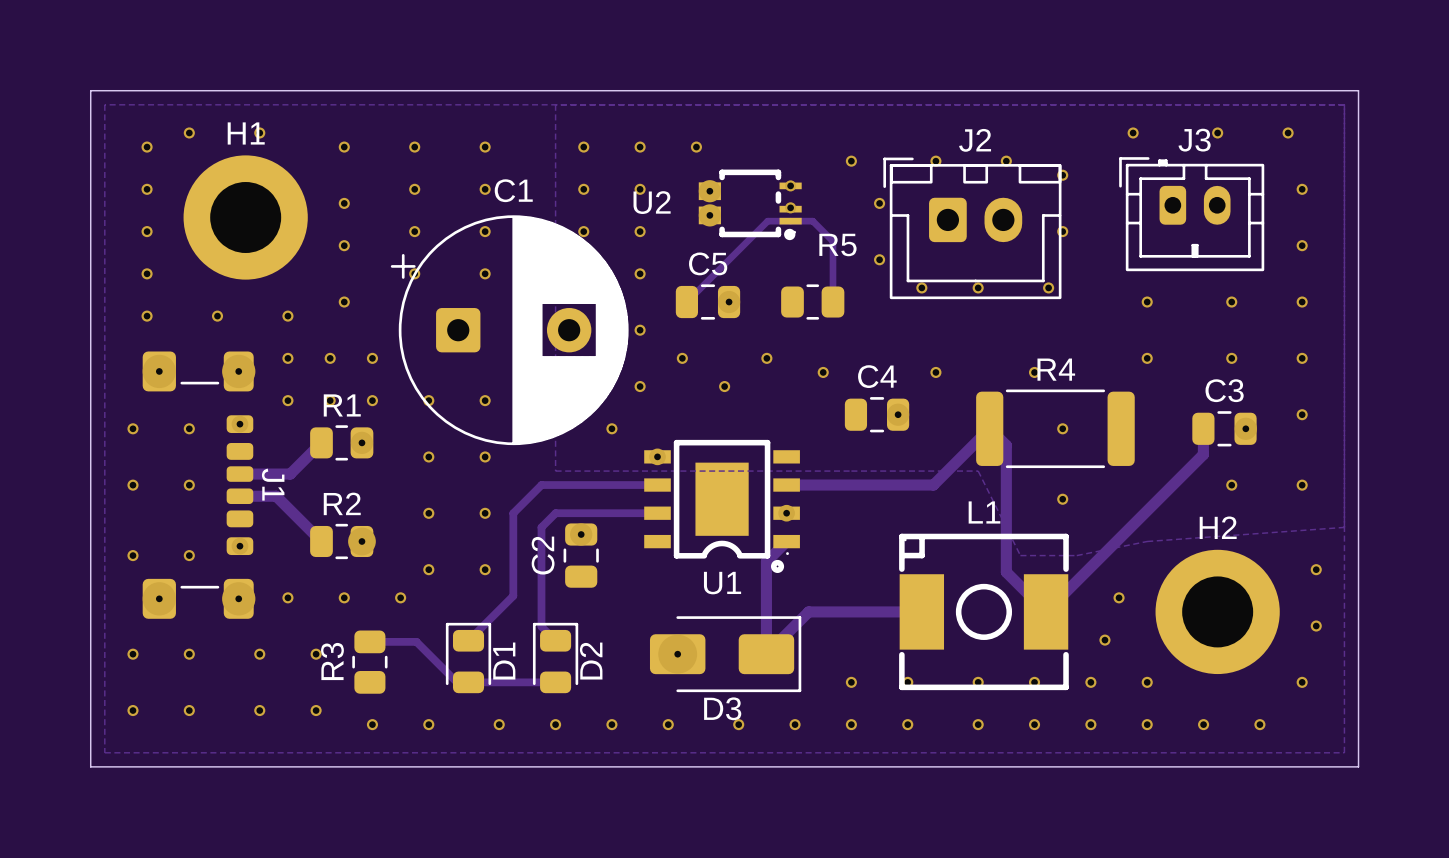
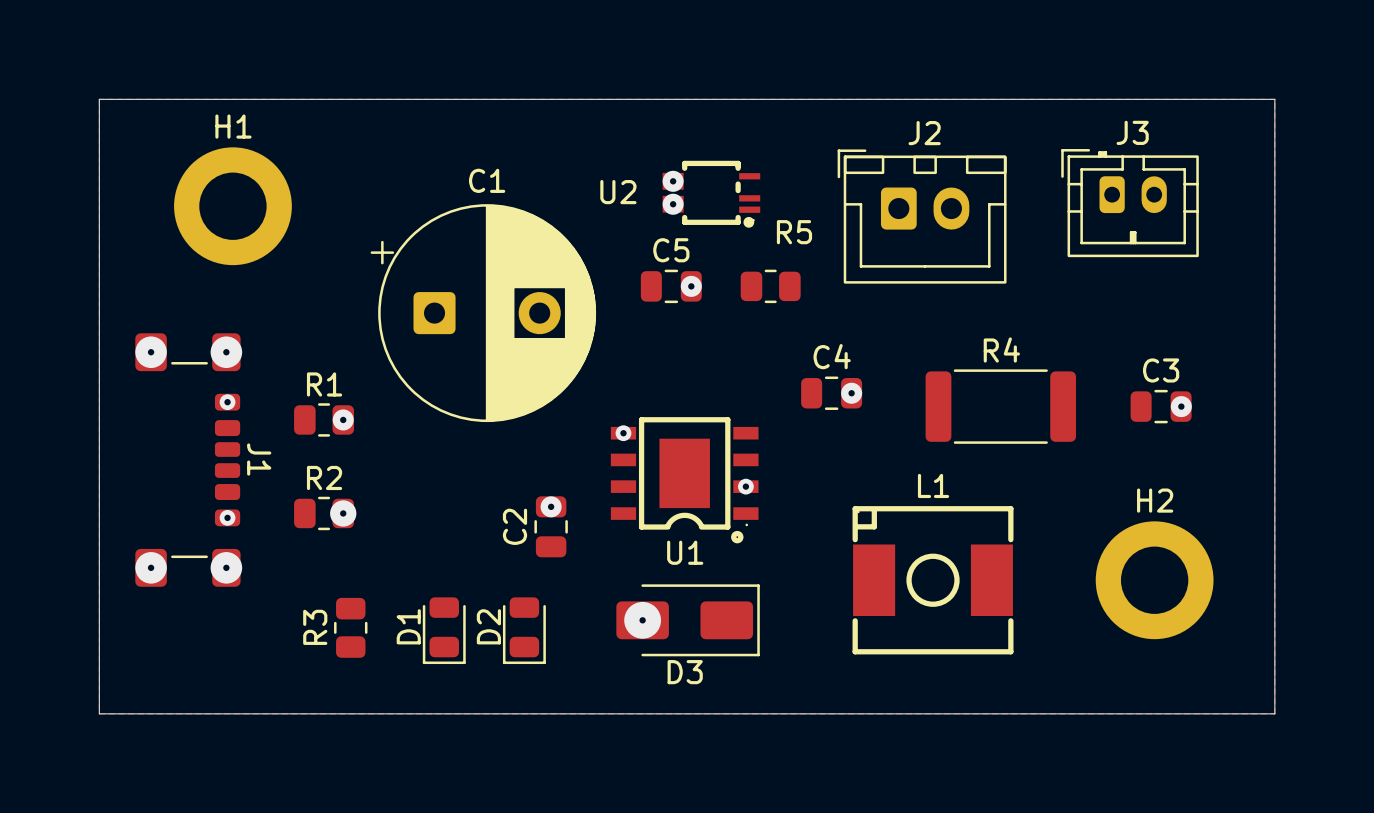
board edge: (90, 90) (1358, 90) (1358, 766) (90, 766) (90, 90) -> (99, 99) (99, 713) (1274, 713) (1274, 99) (99, 99)
zone outline: (555, 104) (555, 471) (978, 471) (1020, 555) (1076, 555) (1147, 541) (1344, 527) -> none
via: (189, 132) -> none
via: (259, 132) -> none
via: (1133, 132) -> none
via: (1217, 132) -> none
via: (1288, 132) -> none
via: (147, 147) -> none
via: (344, 147) -> none
via: (414, 147) -> none
via: (485, 147) -> none
via: (583, 147) -> none
via: (640, 147) -> none
via: (696, 147) -> none
via: (851, 161) -> none
via: (935, 161) -> none
via: (1006, 161) -> none
via: (1062, 175) -> none
via: (790, 185) -> none
via: (147, 189) -> none
via: (414, 189) -> none
via: (485, 189) -> none
via: (583, 189) -> none
via: (640, 189) -> none
via: (1302, 189) -> none
via: (344, 203) -> none
via: (879, 203) -> none
via: (790, 207) -> none
via: (147, 231) -> none
via: (414, 231) -> none
via: (485, 231) -> none
via: (583, 231) -> none
via: (640, 231) -> none
via: (1062, 231) -> none
via: (344, 245) -> none
via: (1302, 245) -> none
via: (879, 259) -> none
via: (147, 273) -> none
via: (414, 273) -> none
via: (485, 273) -> none
via: (640, 273) -> none
via: (921, 287) -> none
via: (978, 287) -> none
via: (1048, 287) -> none
via: (344, 302) -> none
track: (686, 302) (767, 221) (812, 221) (832, 241) (832, 302) -> none
via: (1147, 302) -> none
via: (1231, 302) -> none
via: (1302, 302) -> none
via: (147, 316) -> none
via: (217, 316) -> none
via: (287, 316) -> none
via: (640, 330) -> none
via: (287, 358) -> none
via: (330, 358) -> none
via: (372, 358) -> none
via: (682, 358) -> none
via: (766, 358) -> none
via: (1147, 358) -> none
via: (1231, 358) -> none
via: (1302, 358) -> none
via: (823, 372) -> none
via: (935, 372) -> none
via: (1034, 372) -> none
via: (640, 386) -> none
via: (724, 386) -> none
via: (287, 400) -> none
via: (330, 400) -> none
via: (372, 400) -> none
via: (428, 400) -> none
via: (485, 400) -> none
via: (1302, 414) -> none
via: (132, 428) -> none
via: (189, 428) -> none
via: (611, 428) -> none
via: (1062, 428) -> none
track: (1203, 428) (1203, 454) (1046, 611) (1006, 572) (1006, 445) (989, 428) (933, 485) (786, 485) -> none
track: (321, 442) (290, 474) (239, 474) -> none
via: (428, 456) -> none
via: (485, 456) -> none
via: (132, 485) -> none
via: (189, 485) -> none
track: (657, 485) (541, 485) (513, 513) (513, 595) (468, 640) -> none
via: (1231, 485) -> none
via: (1302, 485) -> none
track: (239, 496) (276, 496) (321, 541) -> none
via: (1062, 499) -> none
via: (428, 513) -> none
via: (485, 513) -> none
track: (657, 513) (555, 513) (541, 527) (541, 626) (555, 640) -> none
track: (786, 541) (766, 561) (766, 654) (808, 611) (921, 611) -> none
via: (132, 555) -> none
via: (189, 555) -> none
via: (428, 569) -> none
via: (485, 569) -> none
via: (1316, 569) -> none
via: (287, 597) -> none
via: (344, 597) -> none
via: (400, 597) -> none
via: (1119, 597) -> none
via: (1316, 626) -> none
via: (1104, 640) -> none
track: (369, 641) (416, 641) (456, 682) (555, 682) -> none
via: (132, 654) -> none
via: (189, 654) -> none
via: (259, 654) -> none
via: (316, 654) -> none
D1 rotation: 0° (468, 658) -> 180° (444, 630)
D2 rotation: 0° (555, 658) -> 180° (524, 630)
via: (851, 682) -> none
via: (907, 682) -> none
via: (978, 682) -> none
via: (1034, 682) -> none
via: (1090, 682) -> none
via: (1147, 682) -> none
via: (1302, 682) -> none
via: (132, 710) -> none
via: (189, 710) -> none
via: (259, 710) -> none
via: (316, 710) -> none
via: (372, 724) -> none
via: (428, 724) -> none
via: (499, 724) -> none
via: (555, 724) -> none
via: (611, 724) -> none
via: (668, 724) -> none
via: (738, 724) -> none
via: (795, 724) -> none
via: (851, 724) -> none
via: (907, 724) -> none
via: (978, 724) -> none
via: (1034, 724) -> none
via: (1090, 724) -> none
via: (1147, 724) -> none
via: (1203, 724) -> none
via: (1259, 724) -> none

